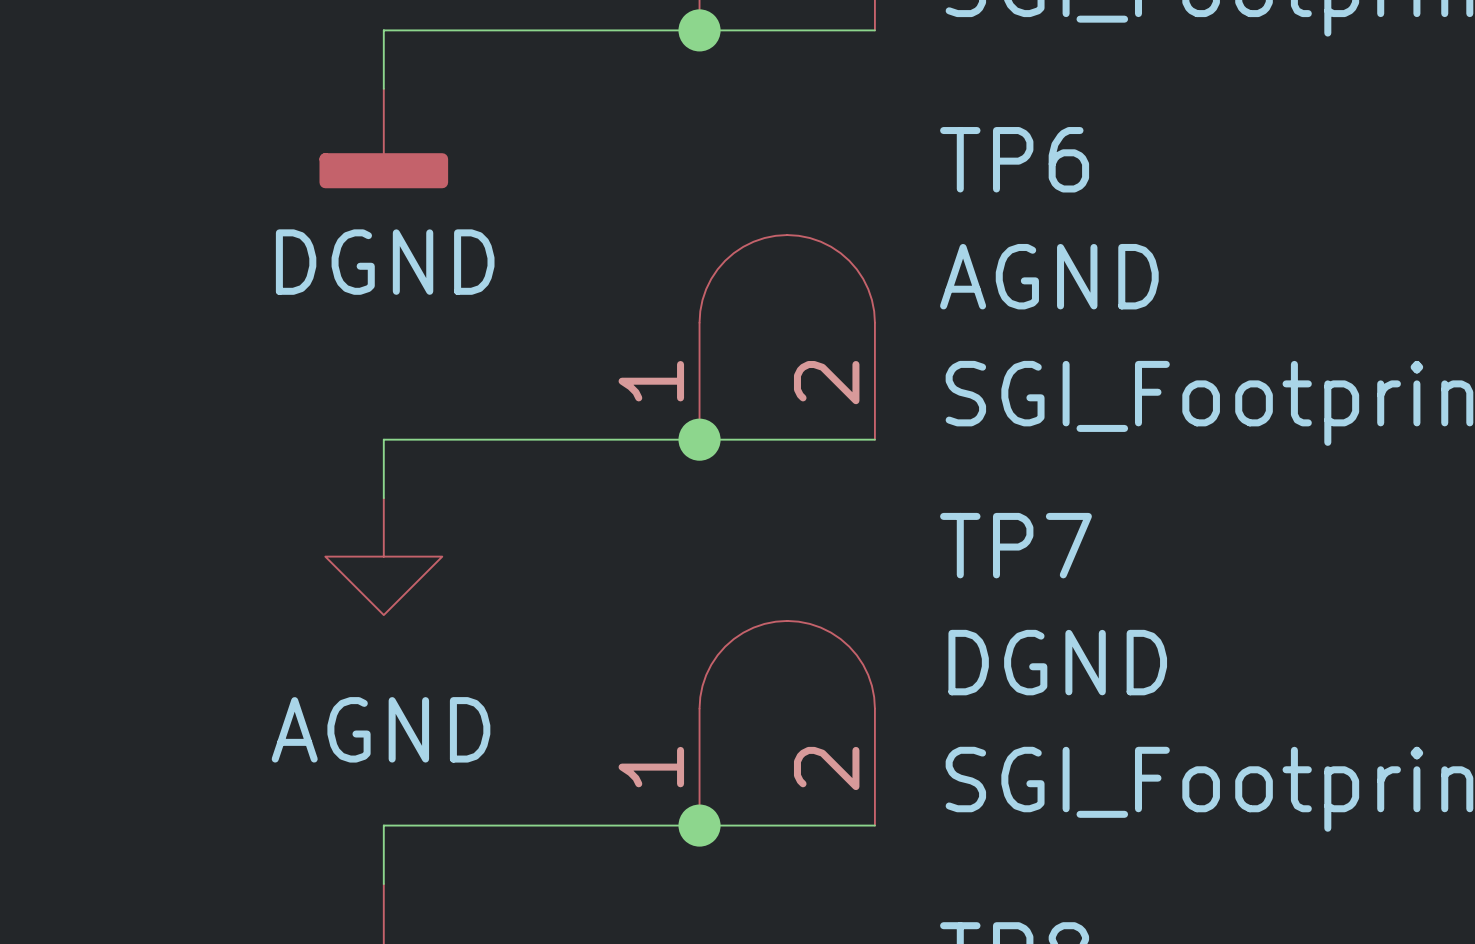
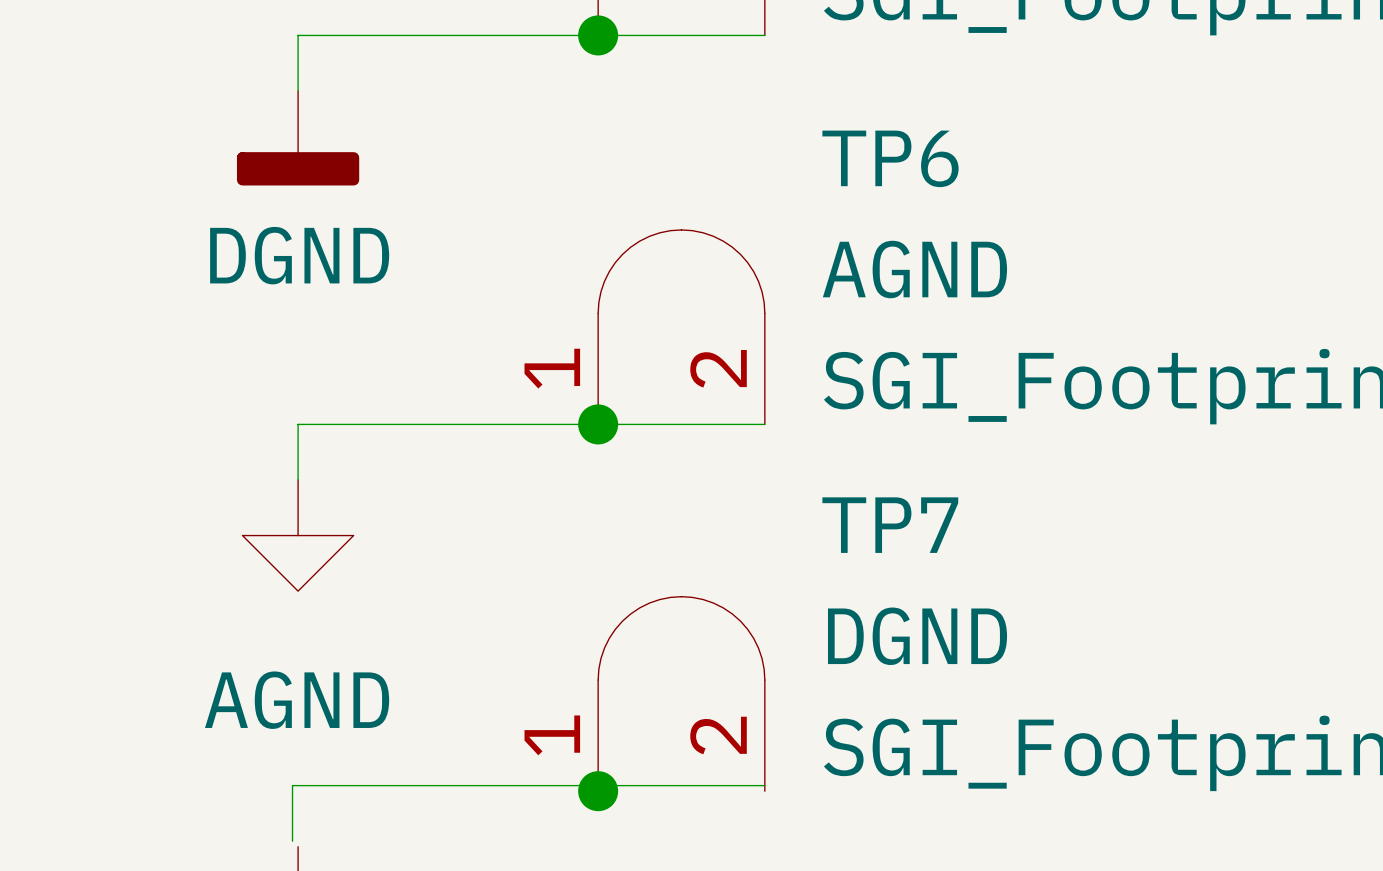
wire: none -> (764, 785) (292, 785) (292, 841)
wire: (874, 825) (383, 825) (383, 884) -> none

